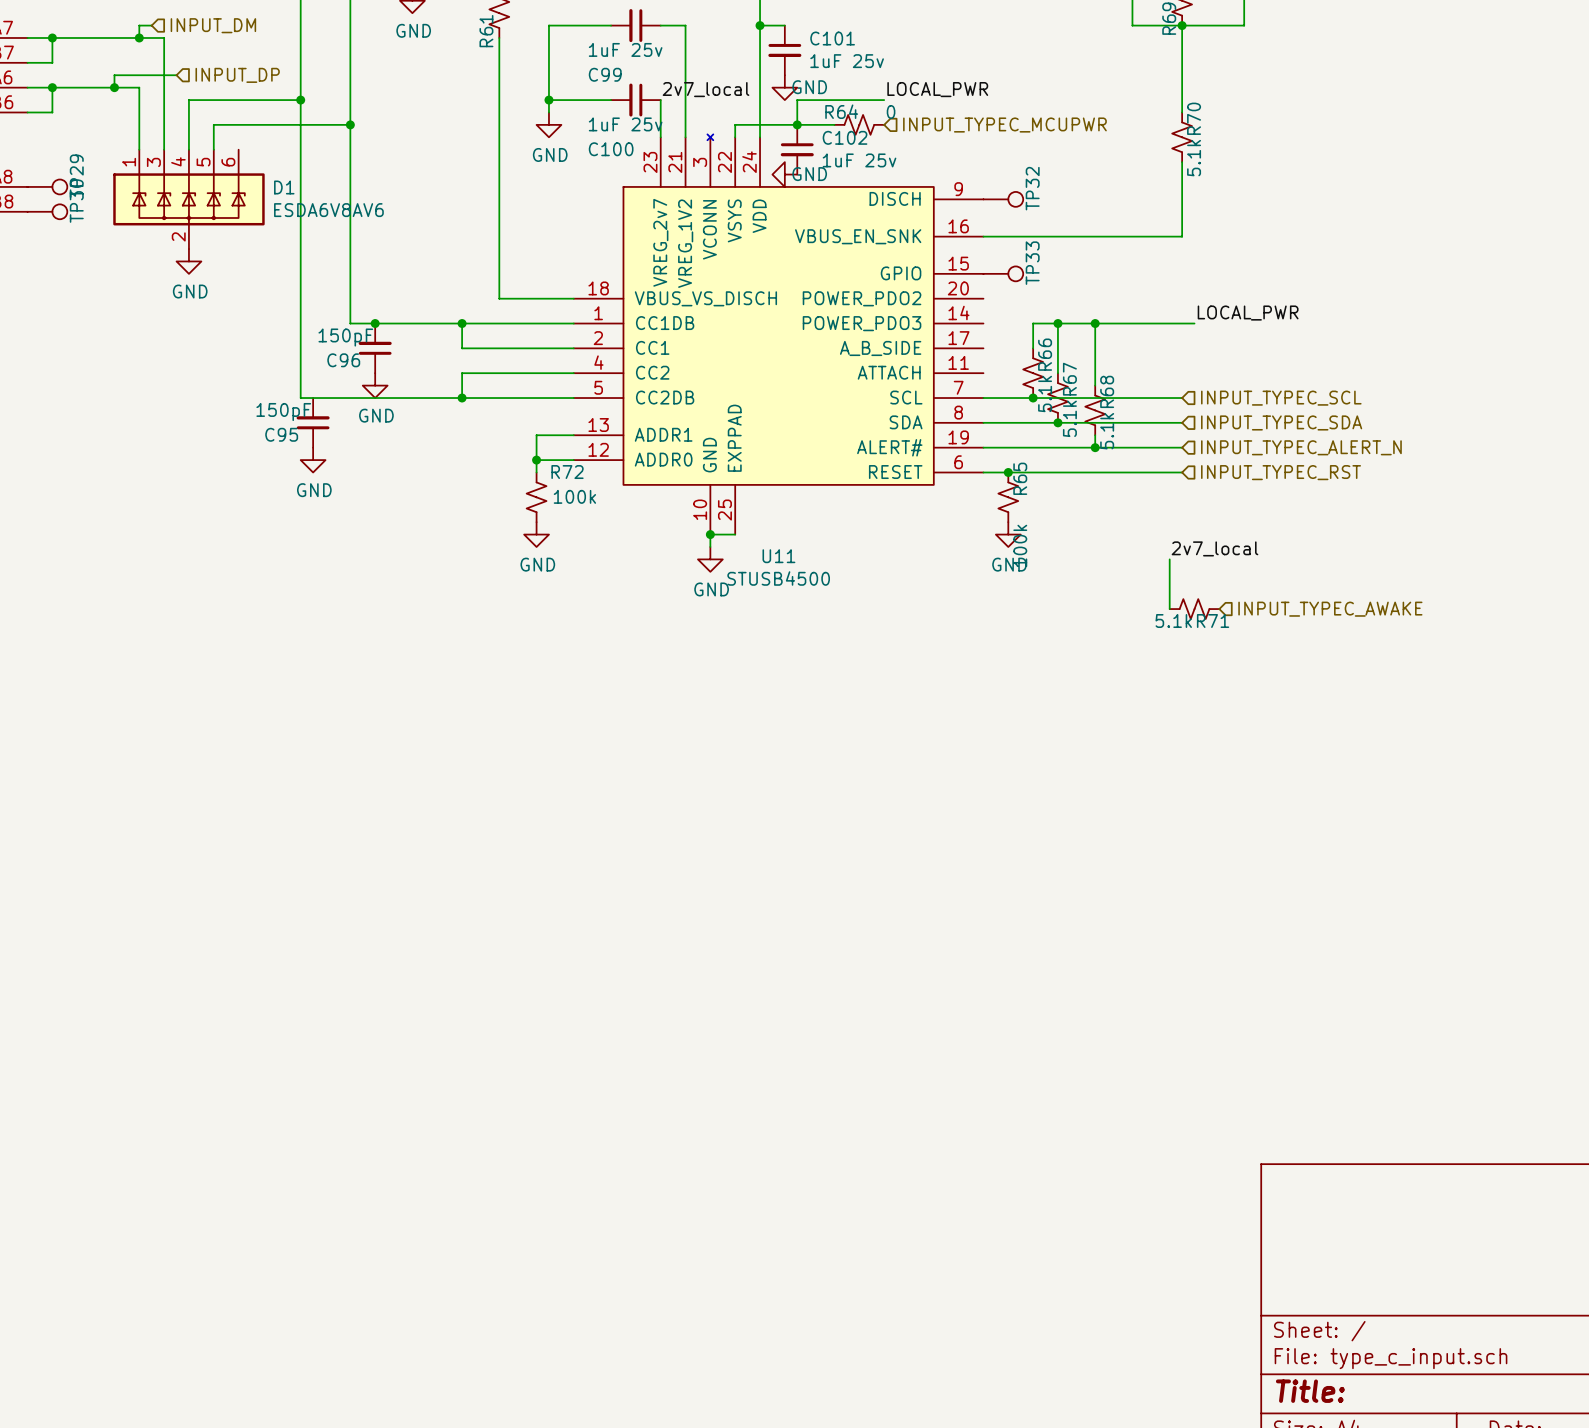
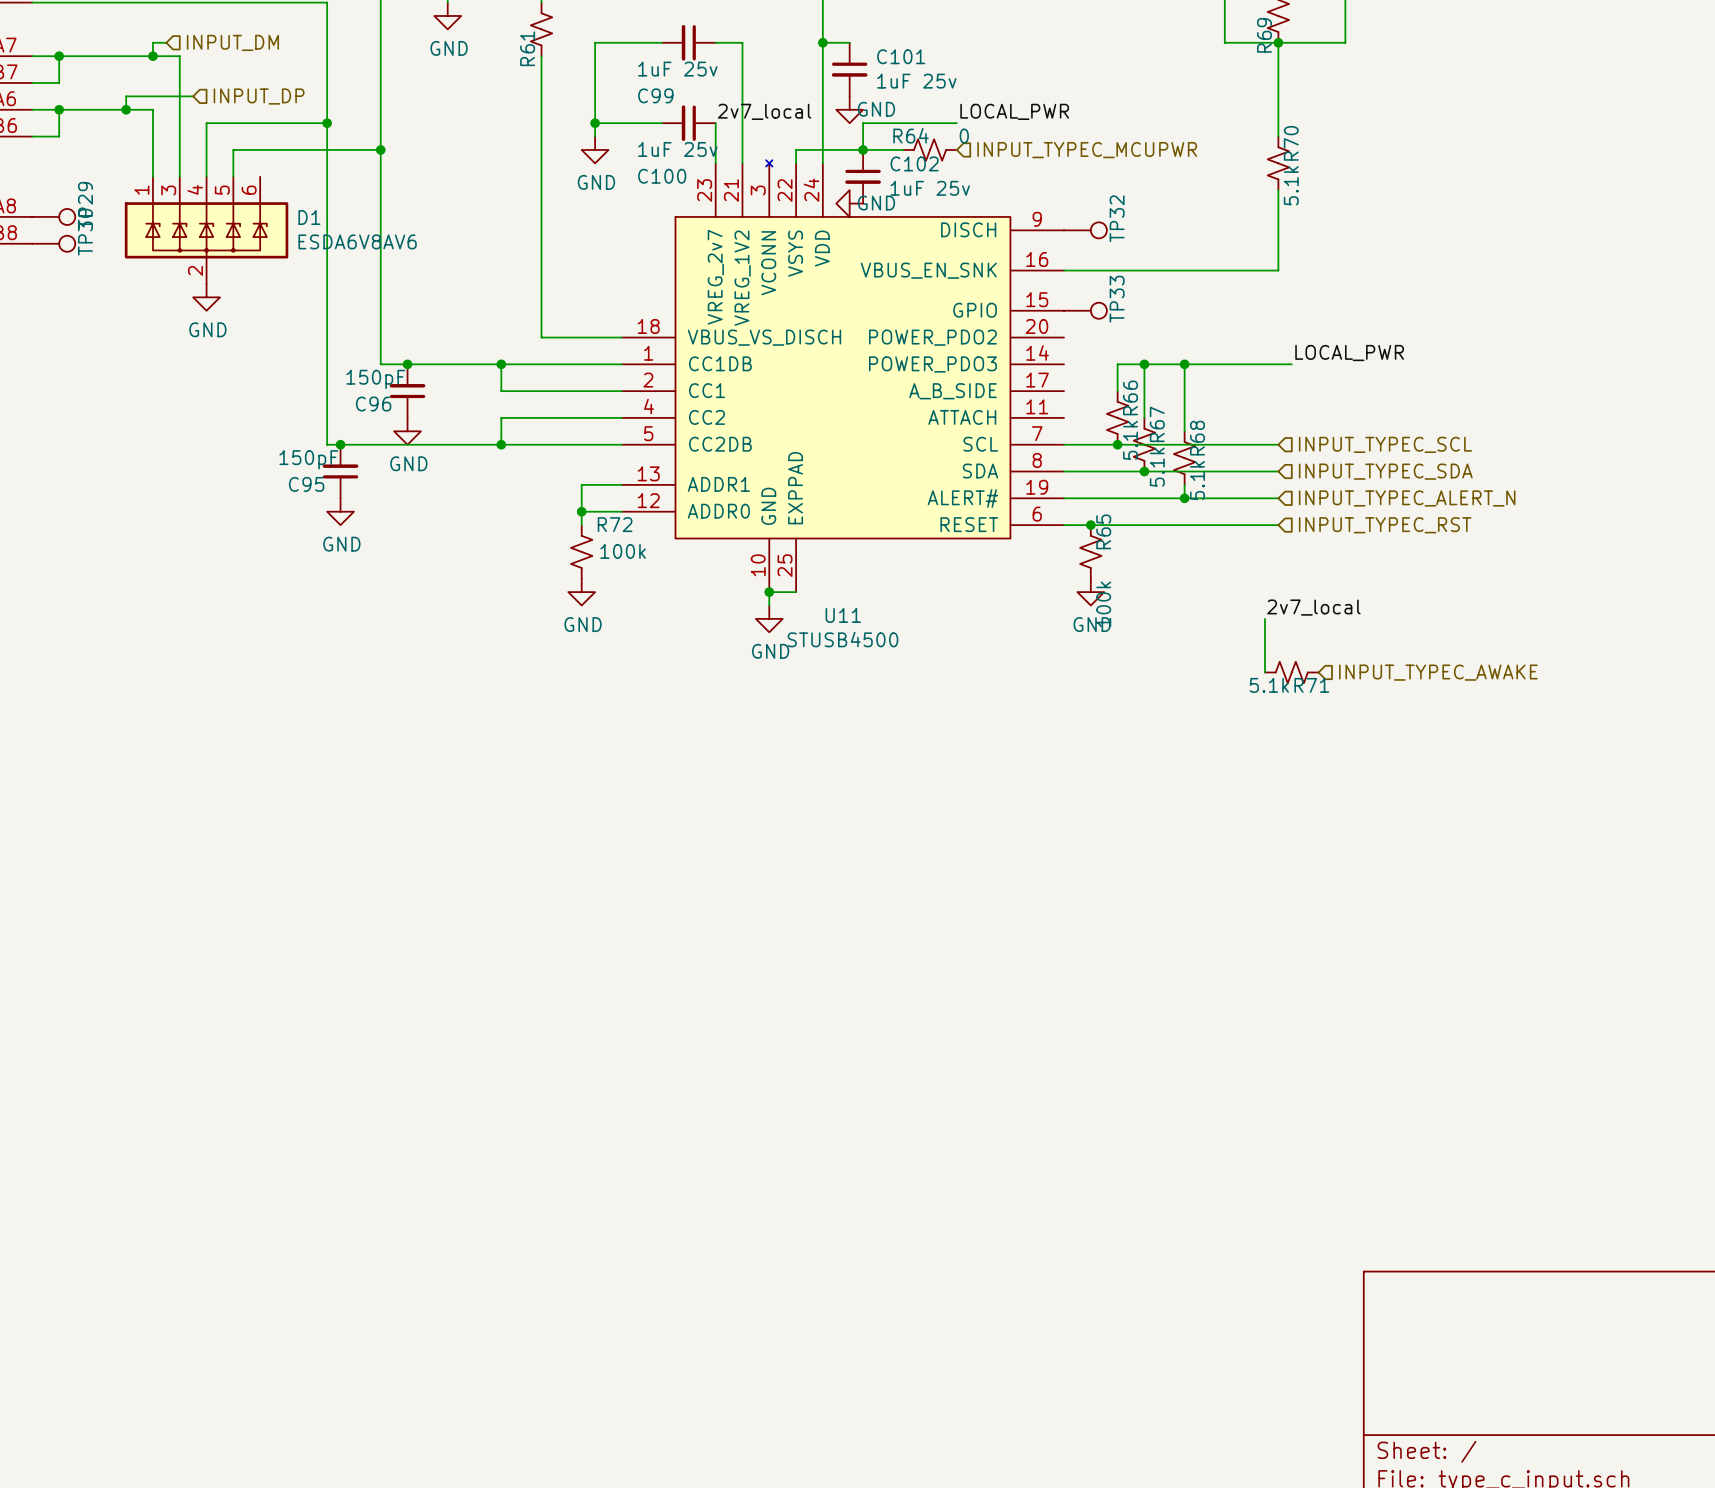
junction: none -> (340, 444)

